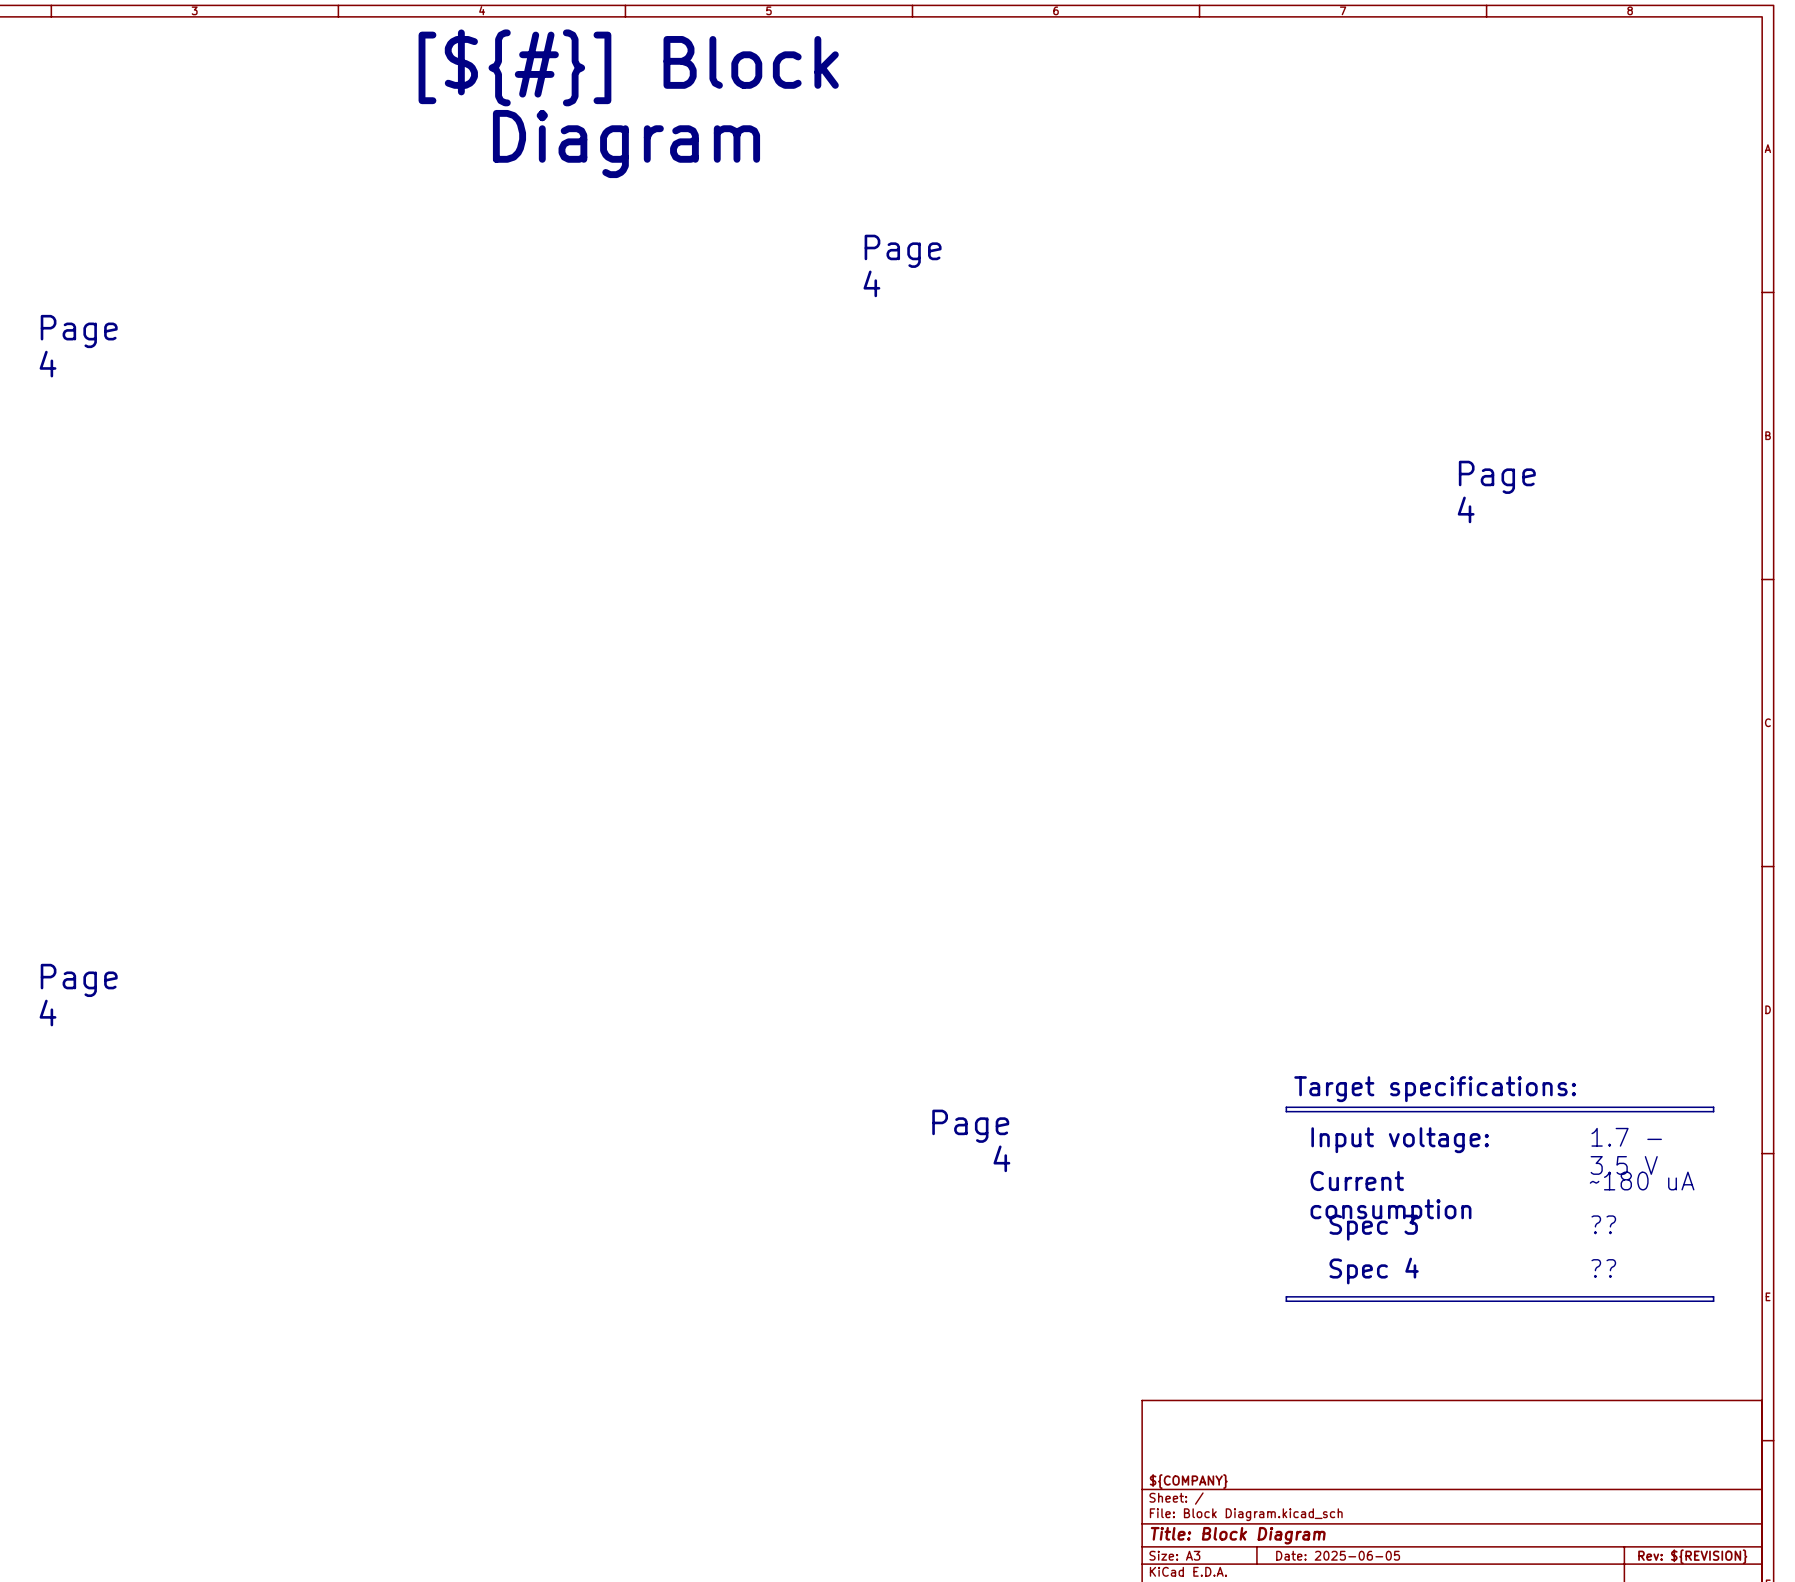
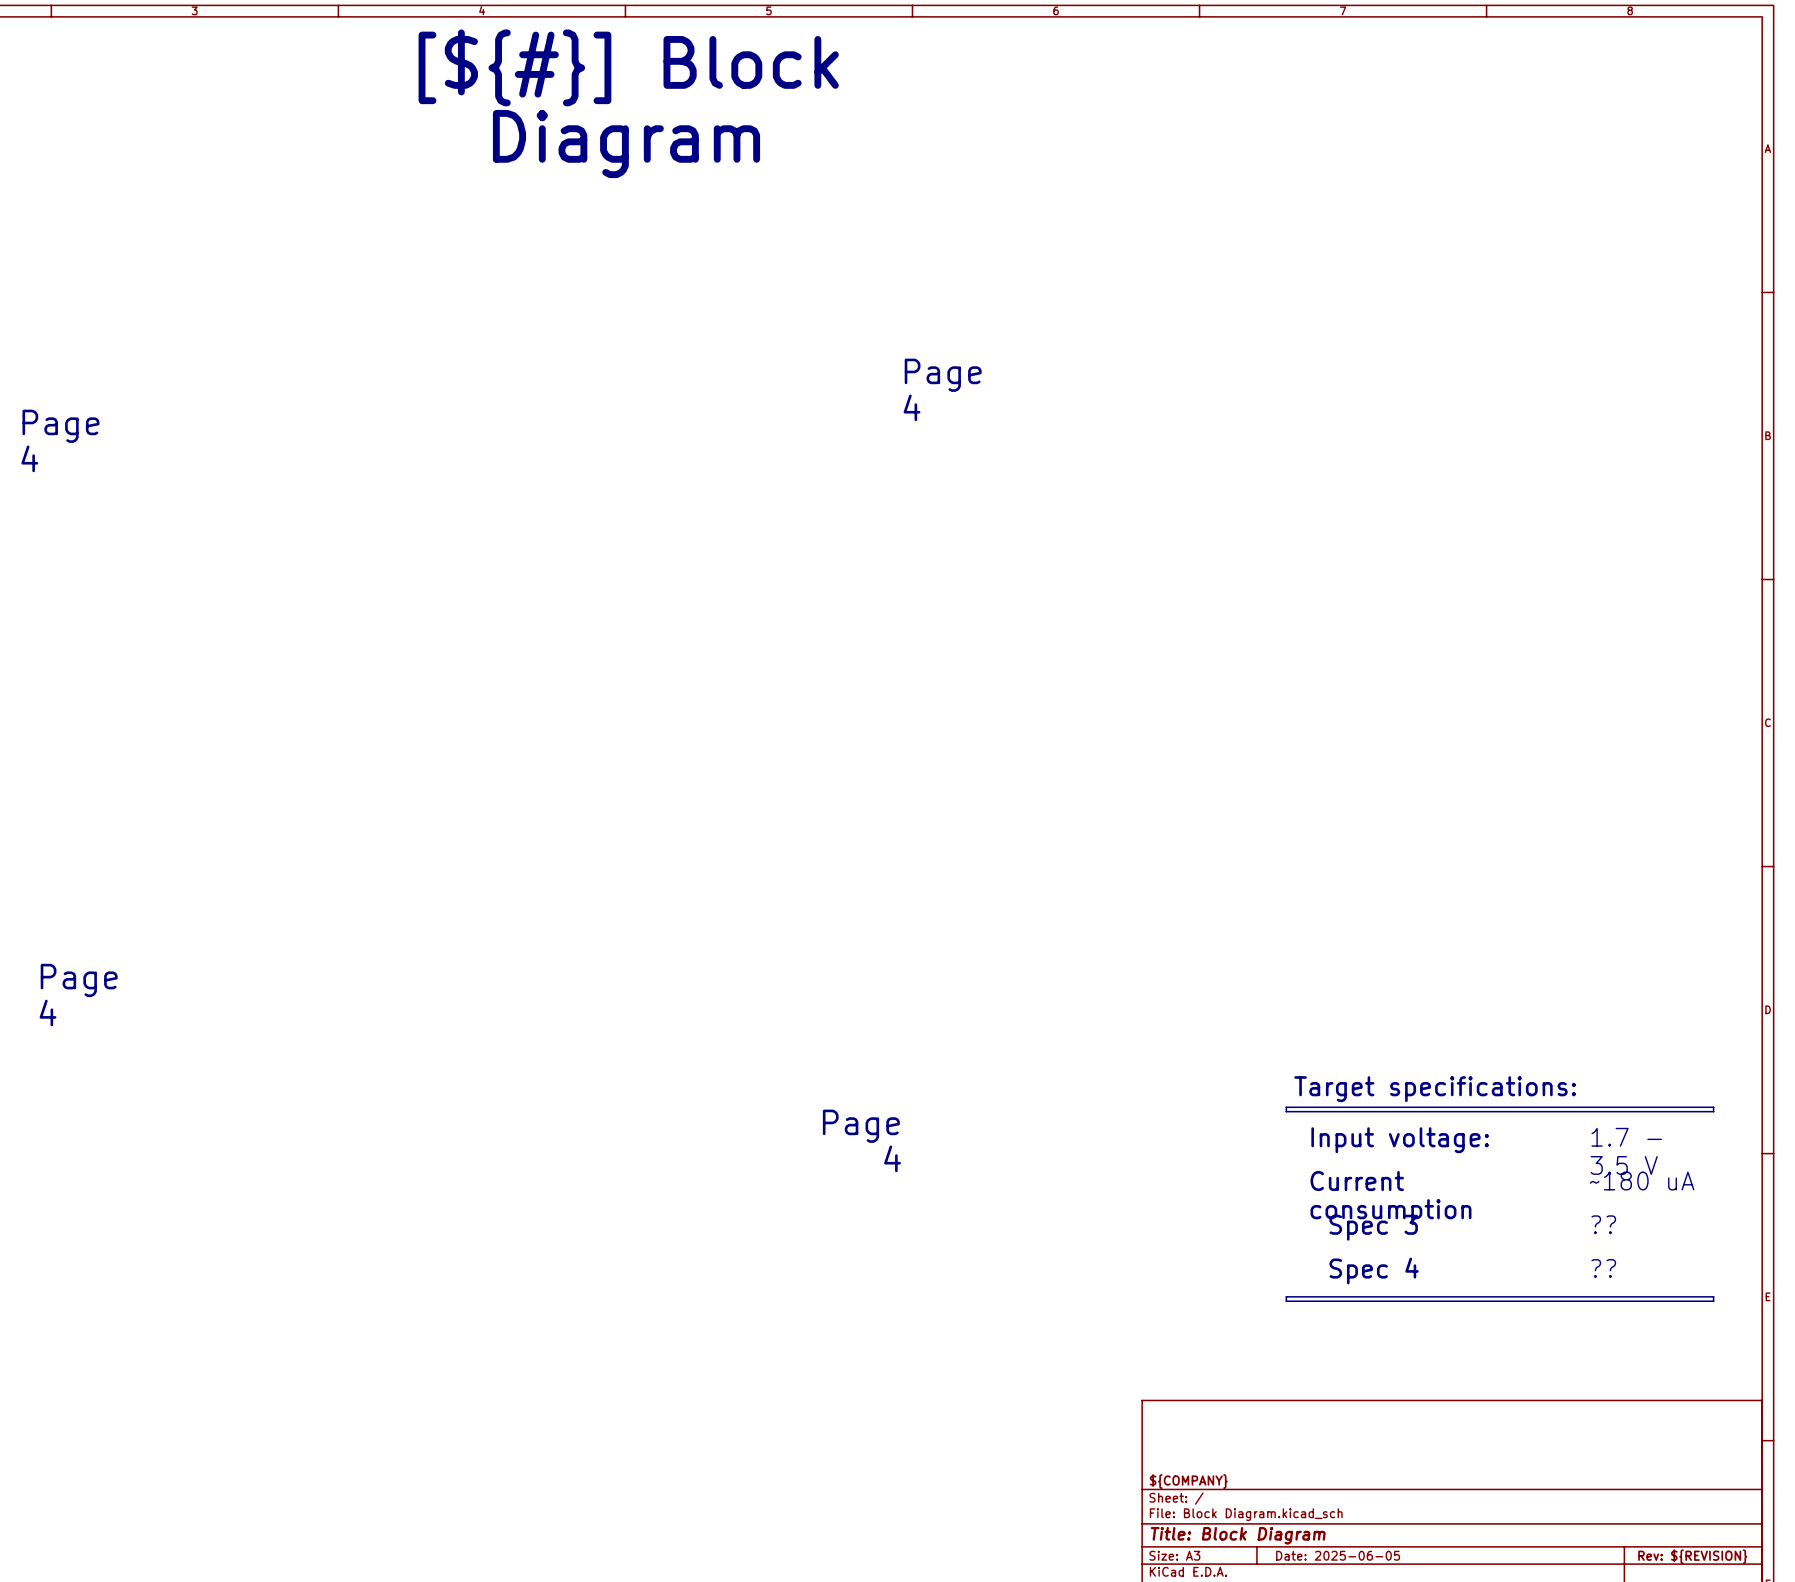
text position: Page (903, 251) -> Page (943, 375)
text position: 4 (871, 283) -> 4 (912, 407)
text position: Page (79, 331) -> Page (60, 426)
text position: 4 (48, 364) -> 4 (29, 458)
text: Page (1497, 477) -> none
text: 4 (1466, 509) -> none
text position: Page (970, 1126) -> Page (861, 1126)
text position: 4 (1001, 1158) -> 4 (892, 1158)

